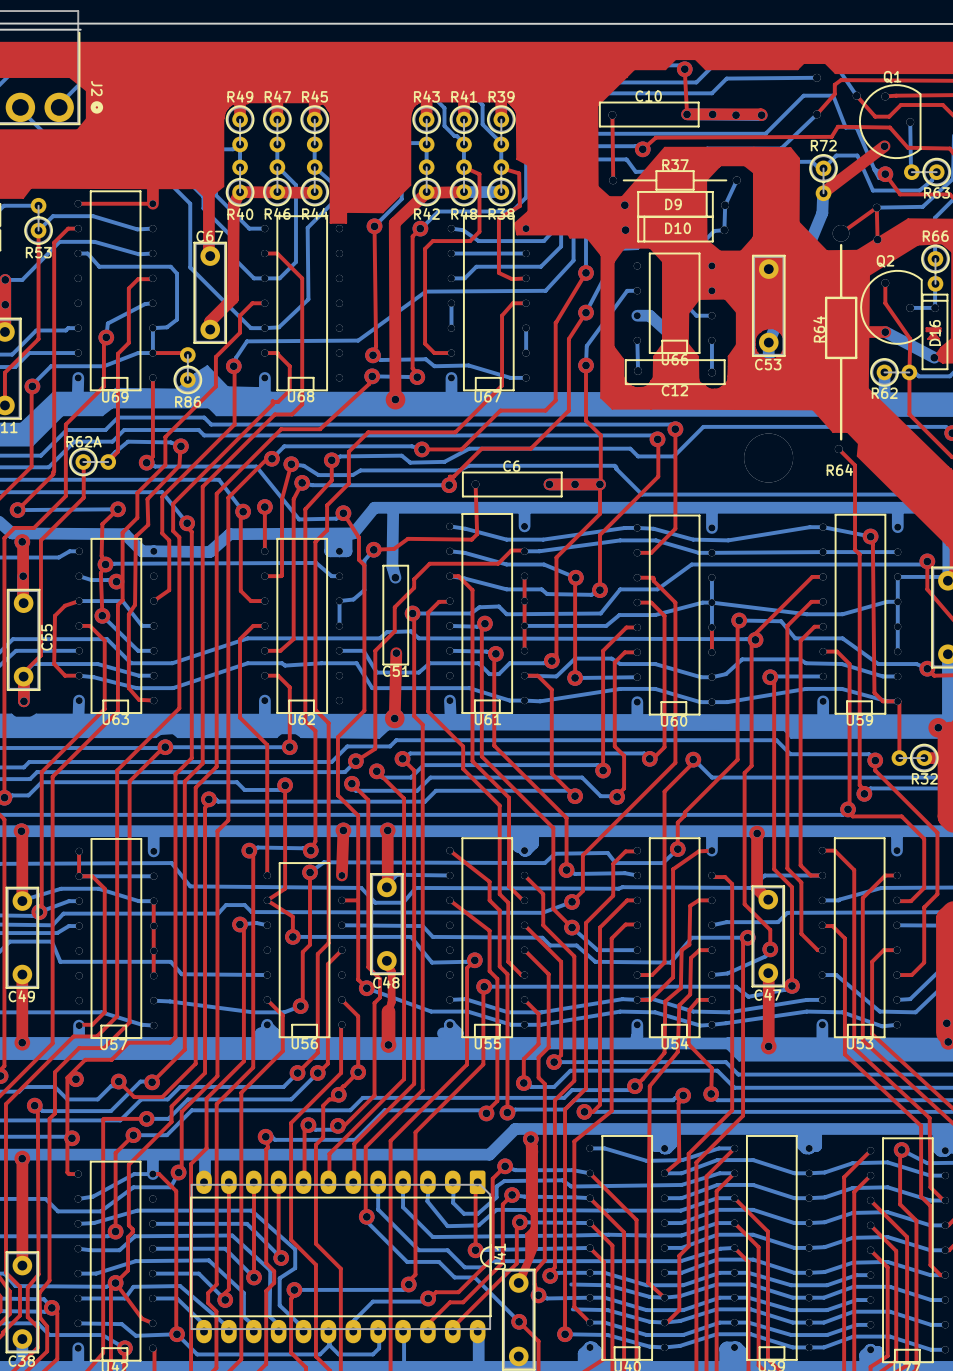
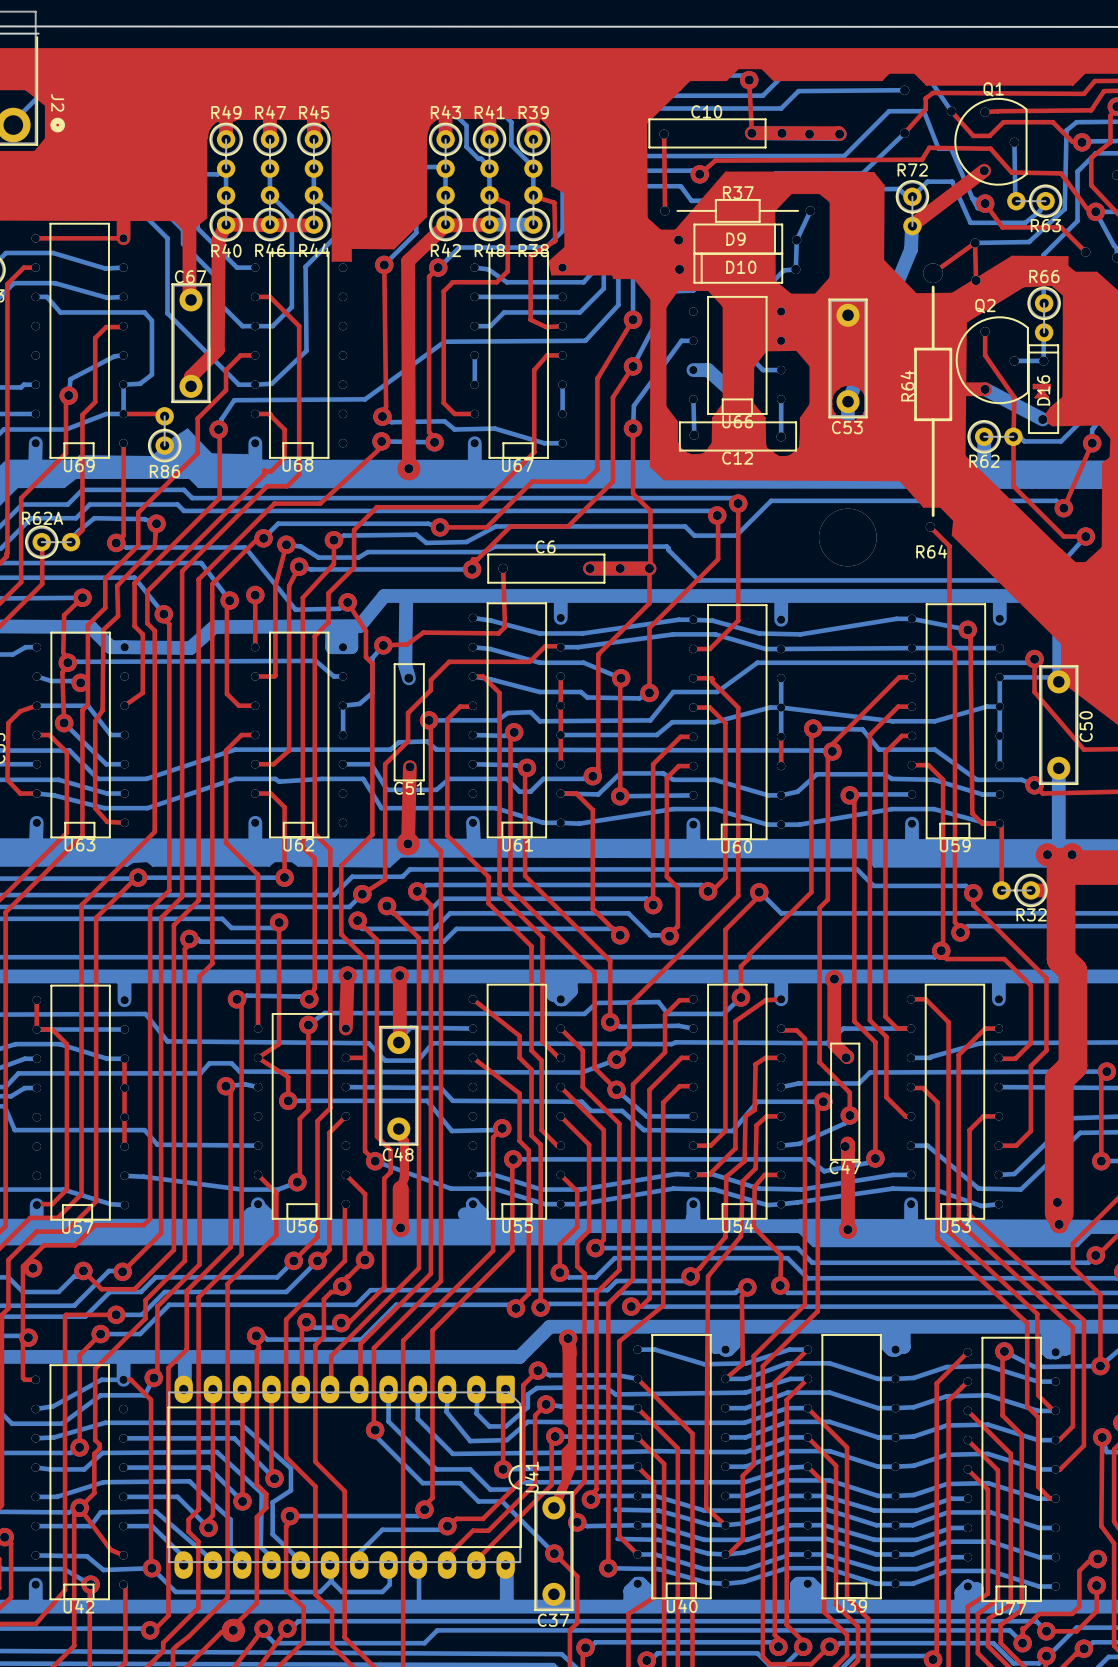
line: none -> (831, 1043) (859, 1043) (859, 1159) (831, 1159) (831, 1043)
via: none -> (846, 1057)
C47: (768, 936) -> none
via: none -> (845, 1146)
text: none -> C47 (845, 1167)

